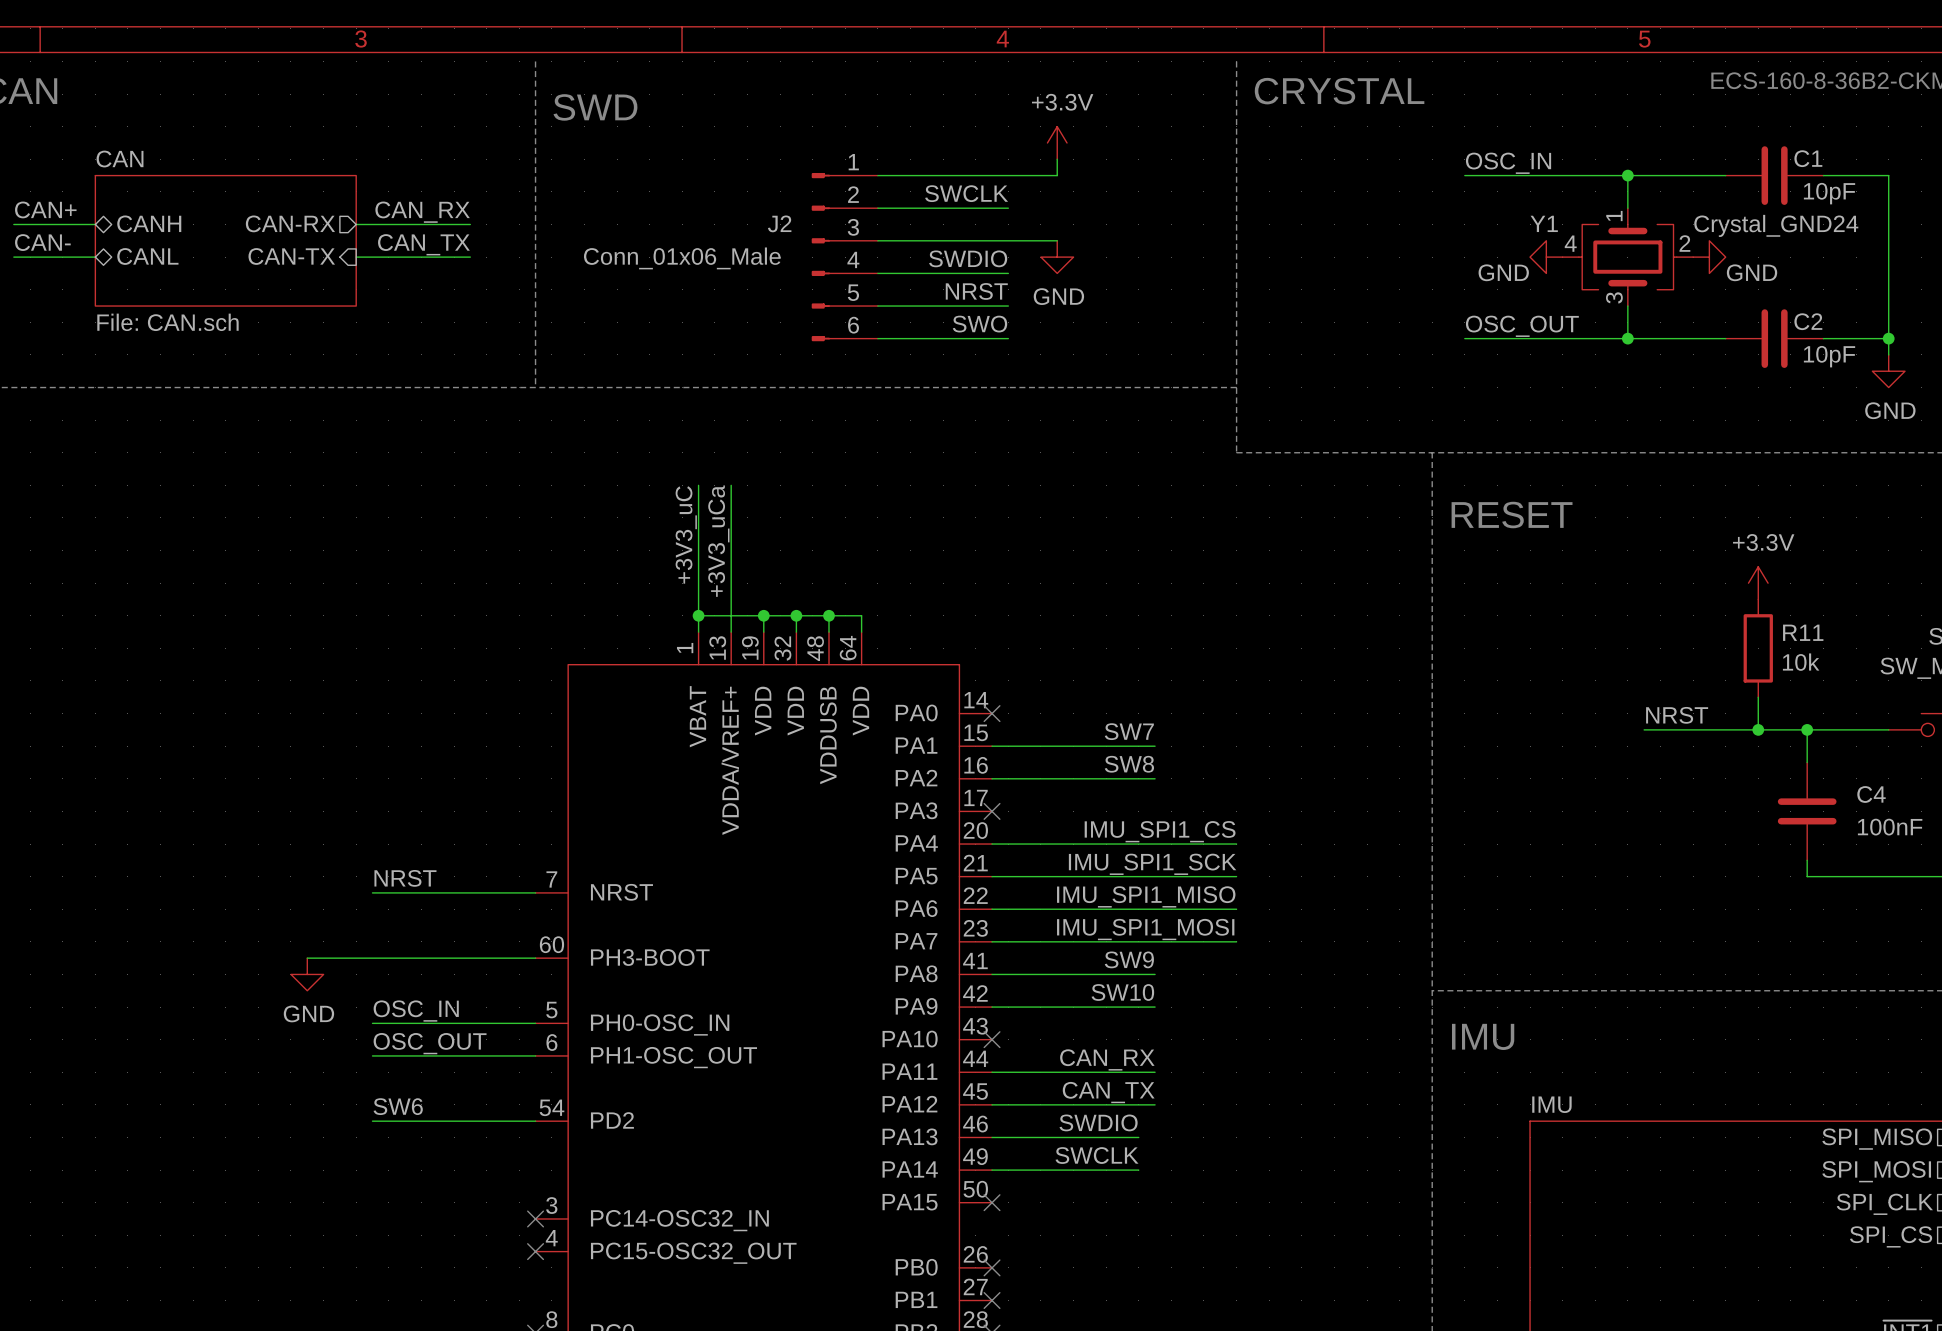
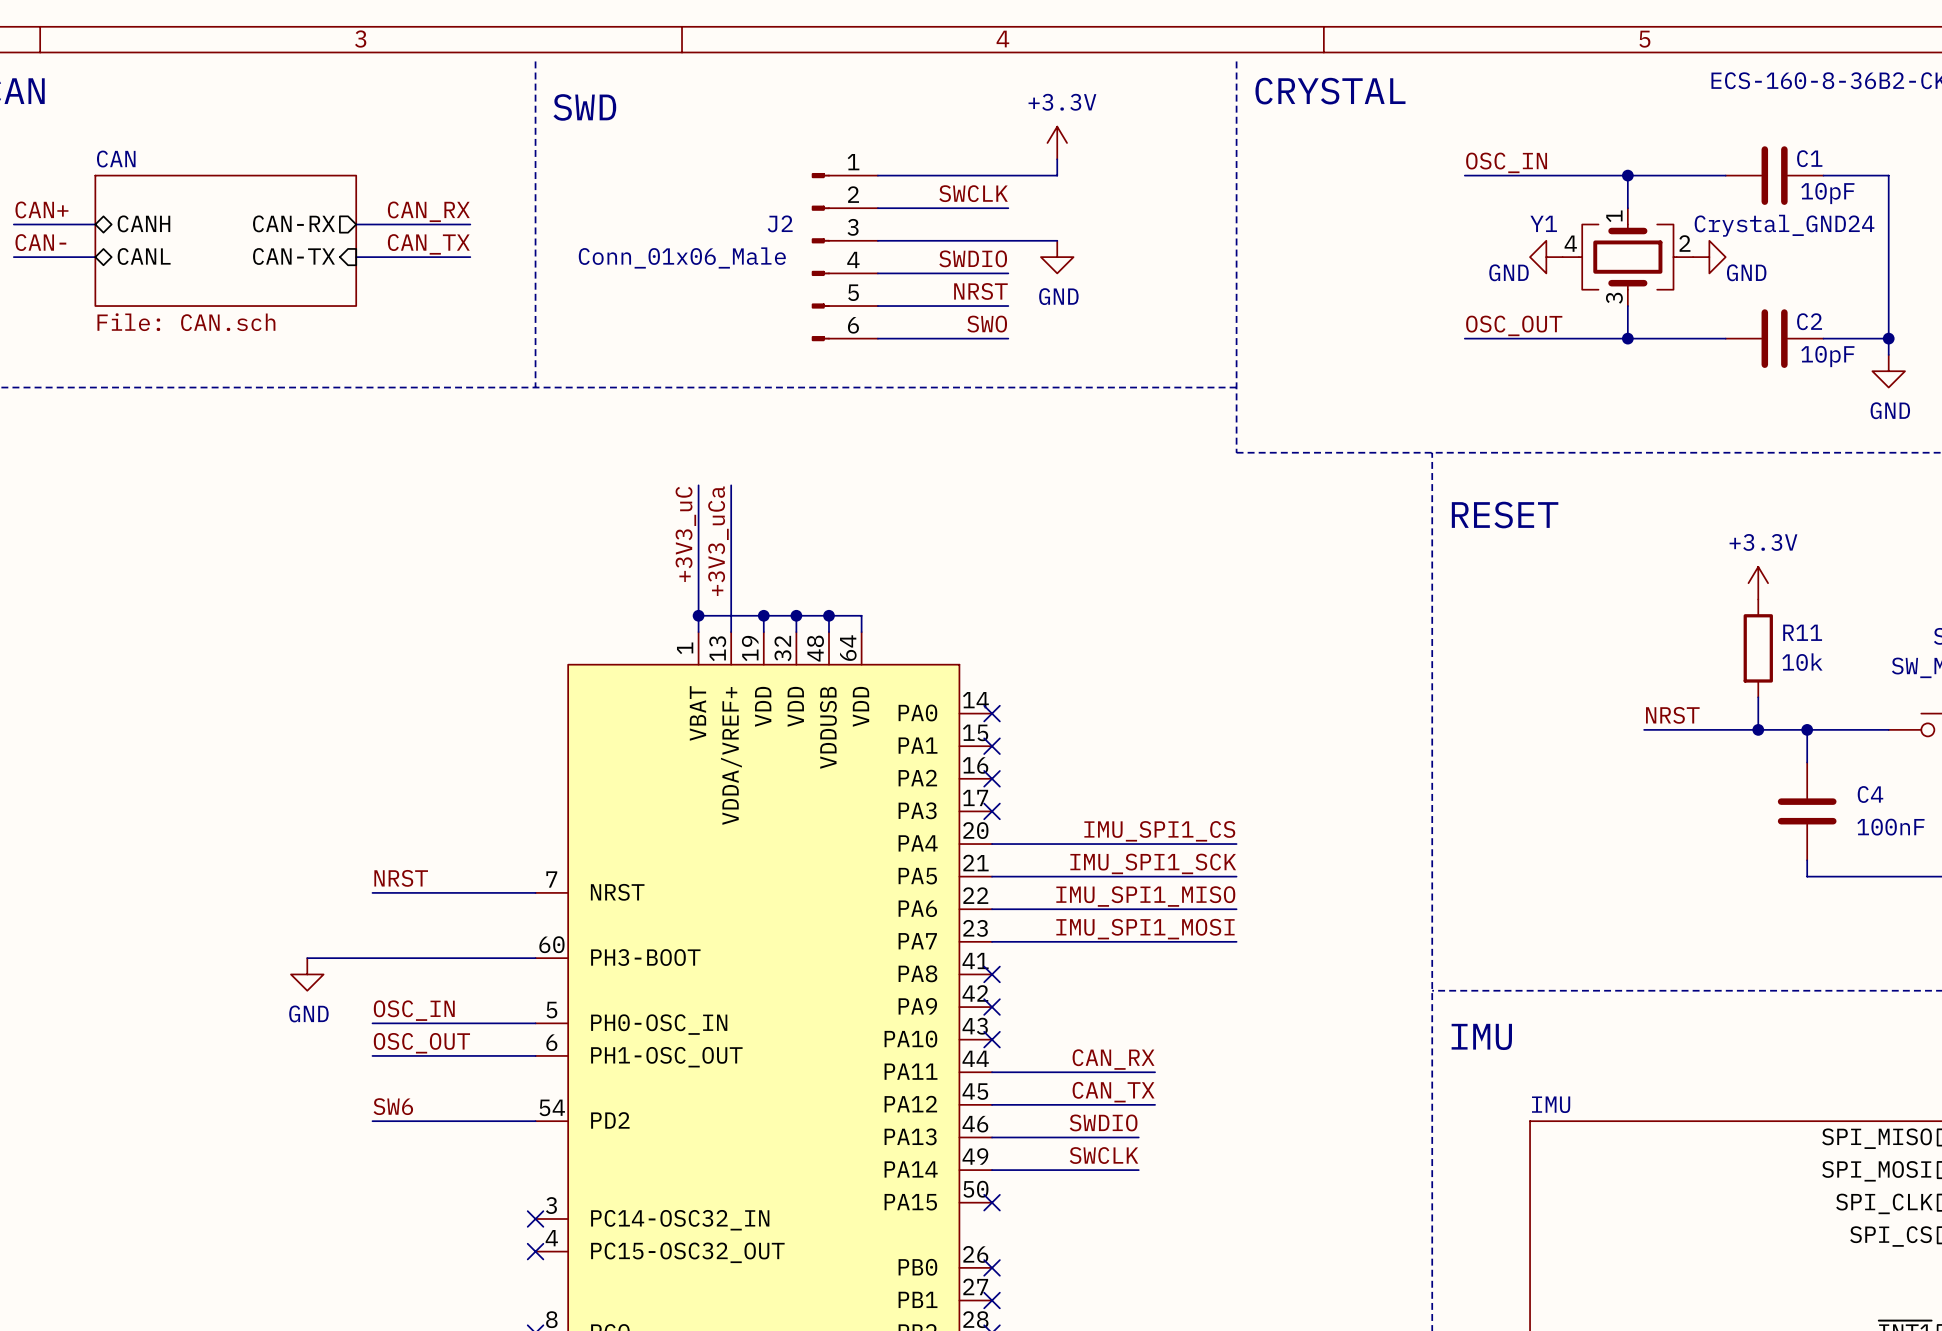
label: SW7 (1129, 731) -> none
wire: (992, 746) (1155, 746) -> none
no-connect mark: none -> (992, 746)
label: SW8 (1129, 764) -> none
wire: (992, 778) (1155, 778) -> none
no-connect mark: none -> (992, 778)
label: SW9 (1129, 959) -> none
wire: (992, 974) (1155, 974) -> none
no-connect mark: none -> (992, 974)
label: SW10 (1122, 992) -> none
wire: (992, 1007) (1155, 1007) -> none
no-connect mark: none -> (992, 1007)

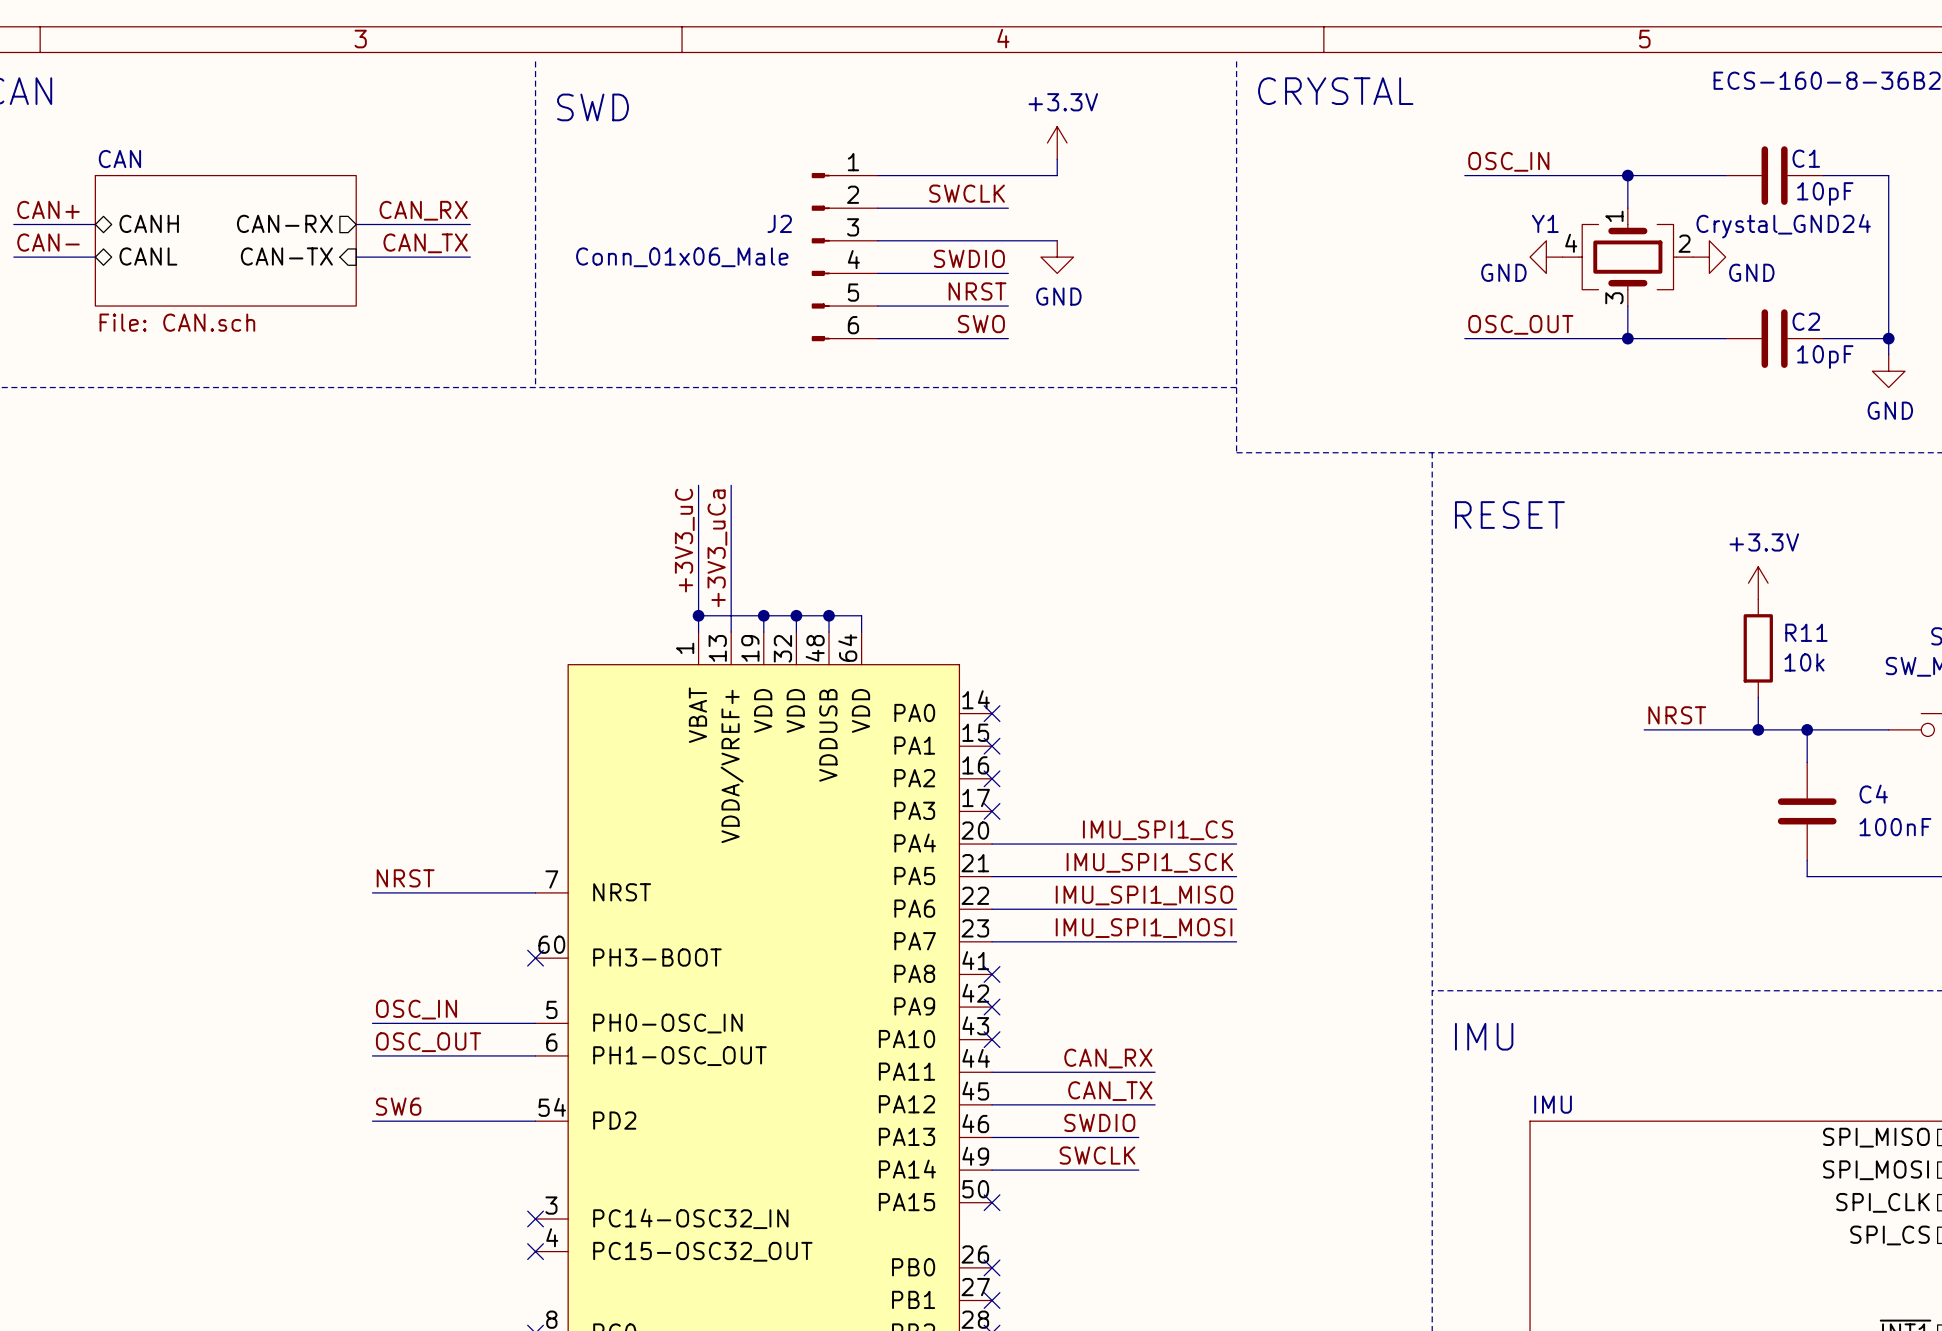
wire: (307, 958) (535, 958) -> none
no-connect mark: none -> (535, 958)
power symbol: GND (307, 974) -> none

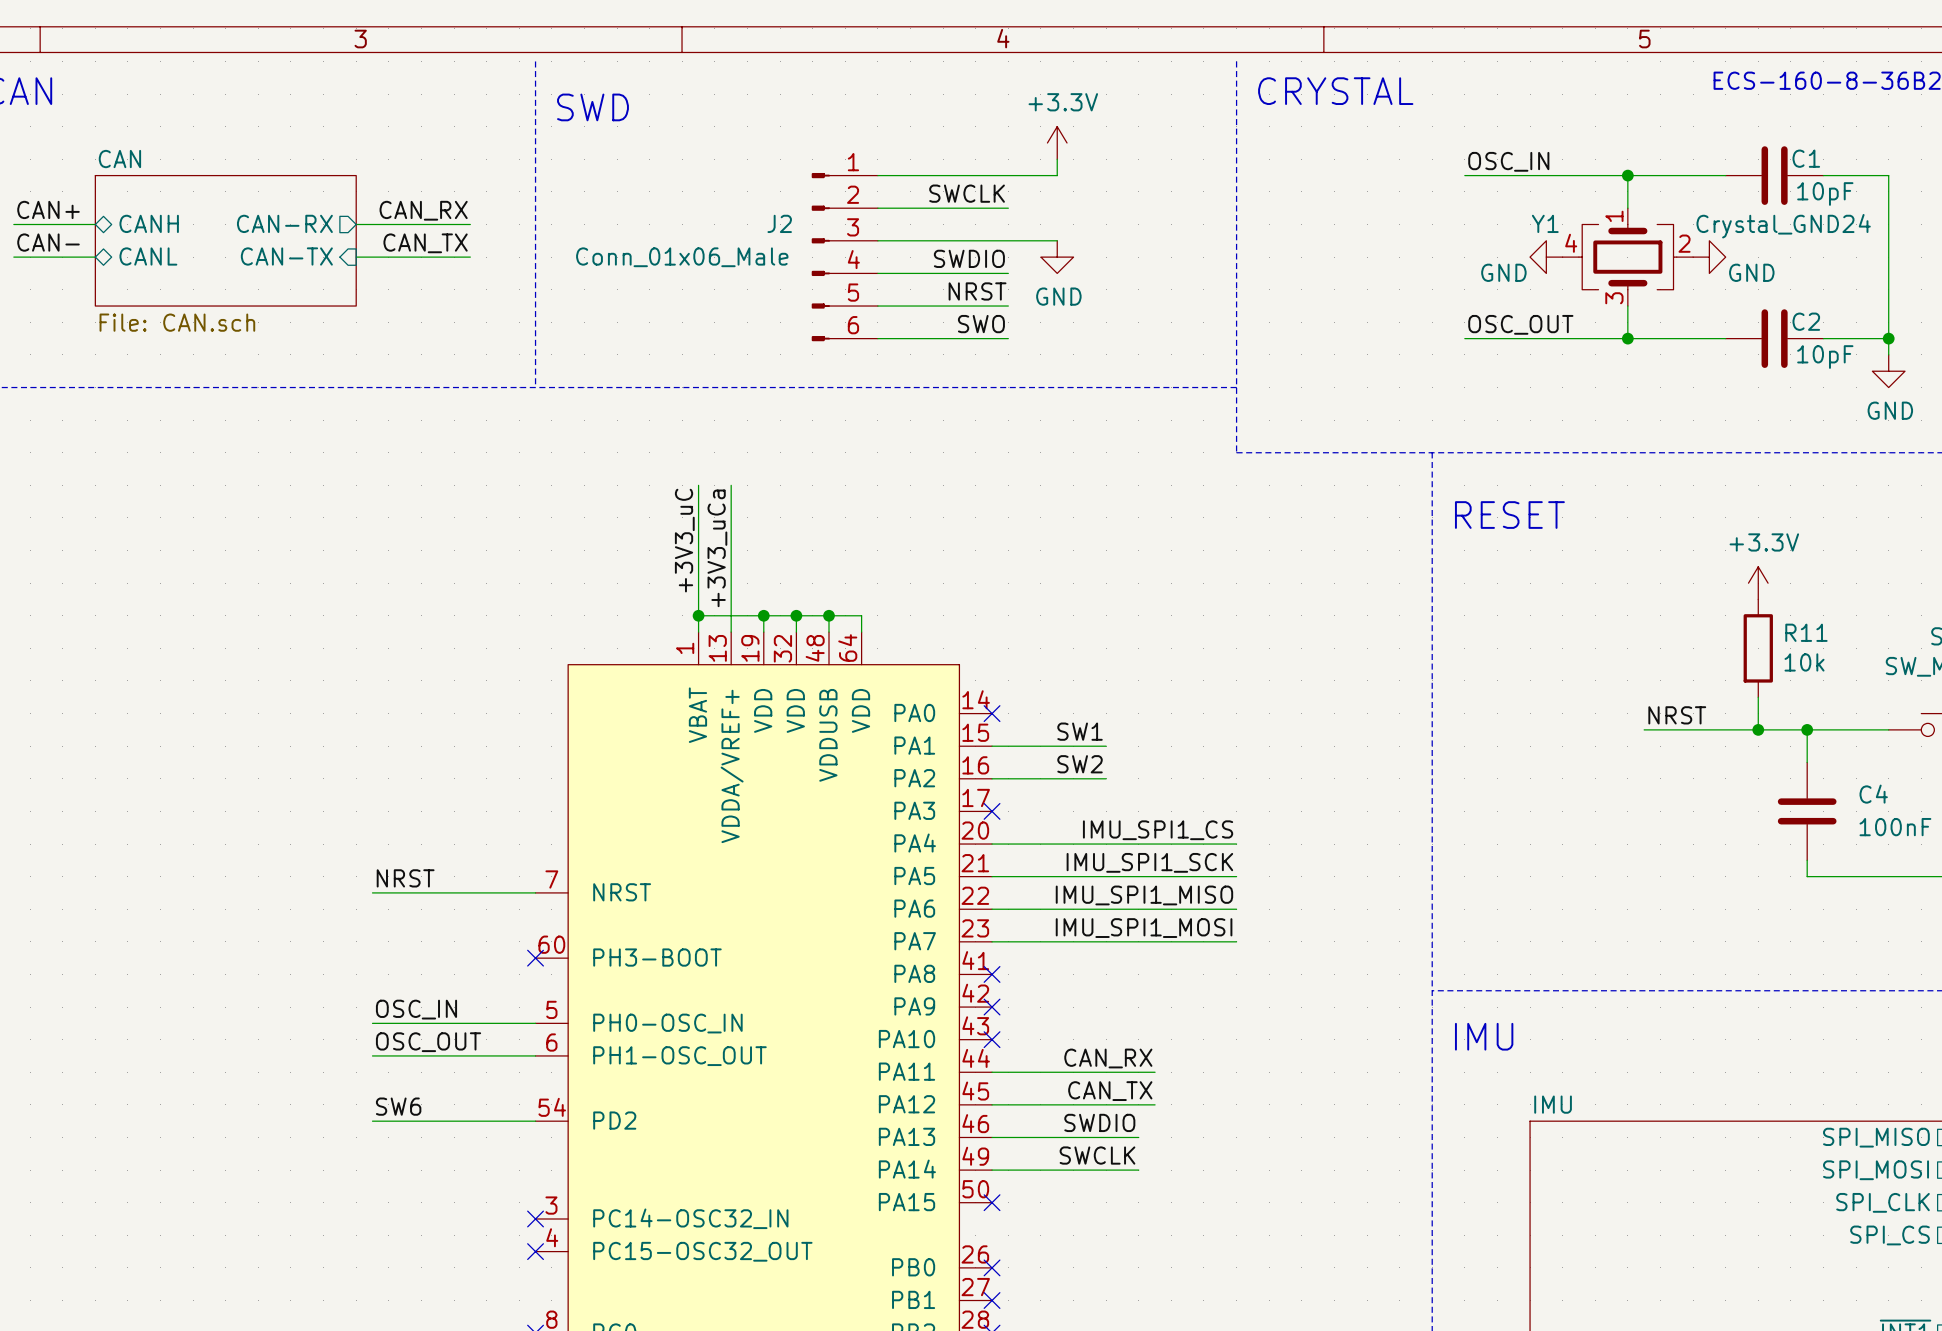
label: none -> SW1 (1080, 731)
wire: none -> (992, 746) (1106, 746)
no-connect mark: (992, 746) -> none
label: none -> SW2 (1080, 764)
wire: none -> (992, 778) (1106, 778)
no-connect mark: (992, 778) -> none

